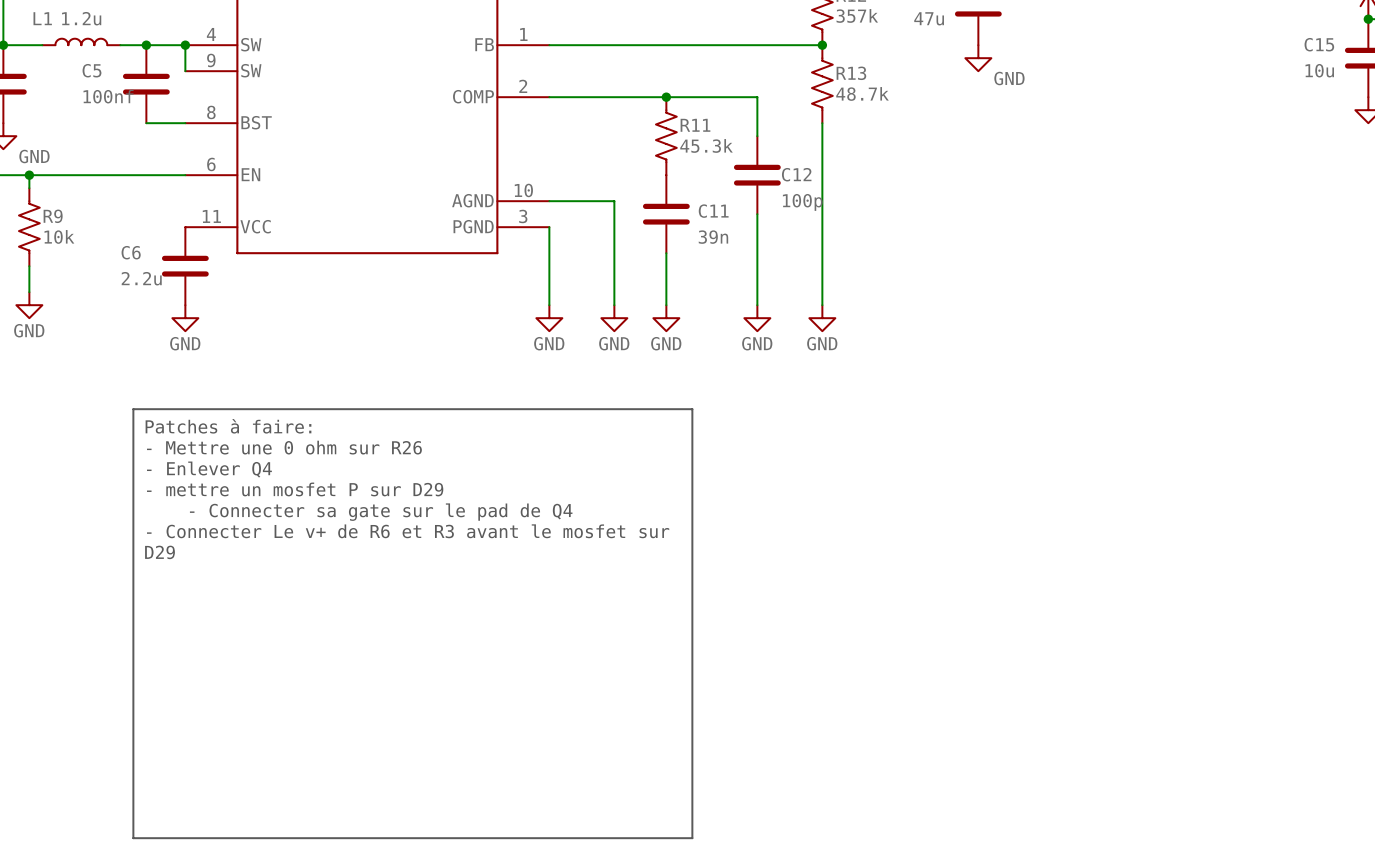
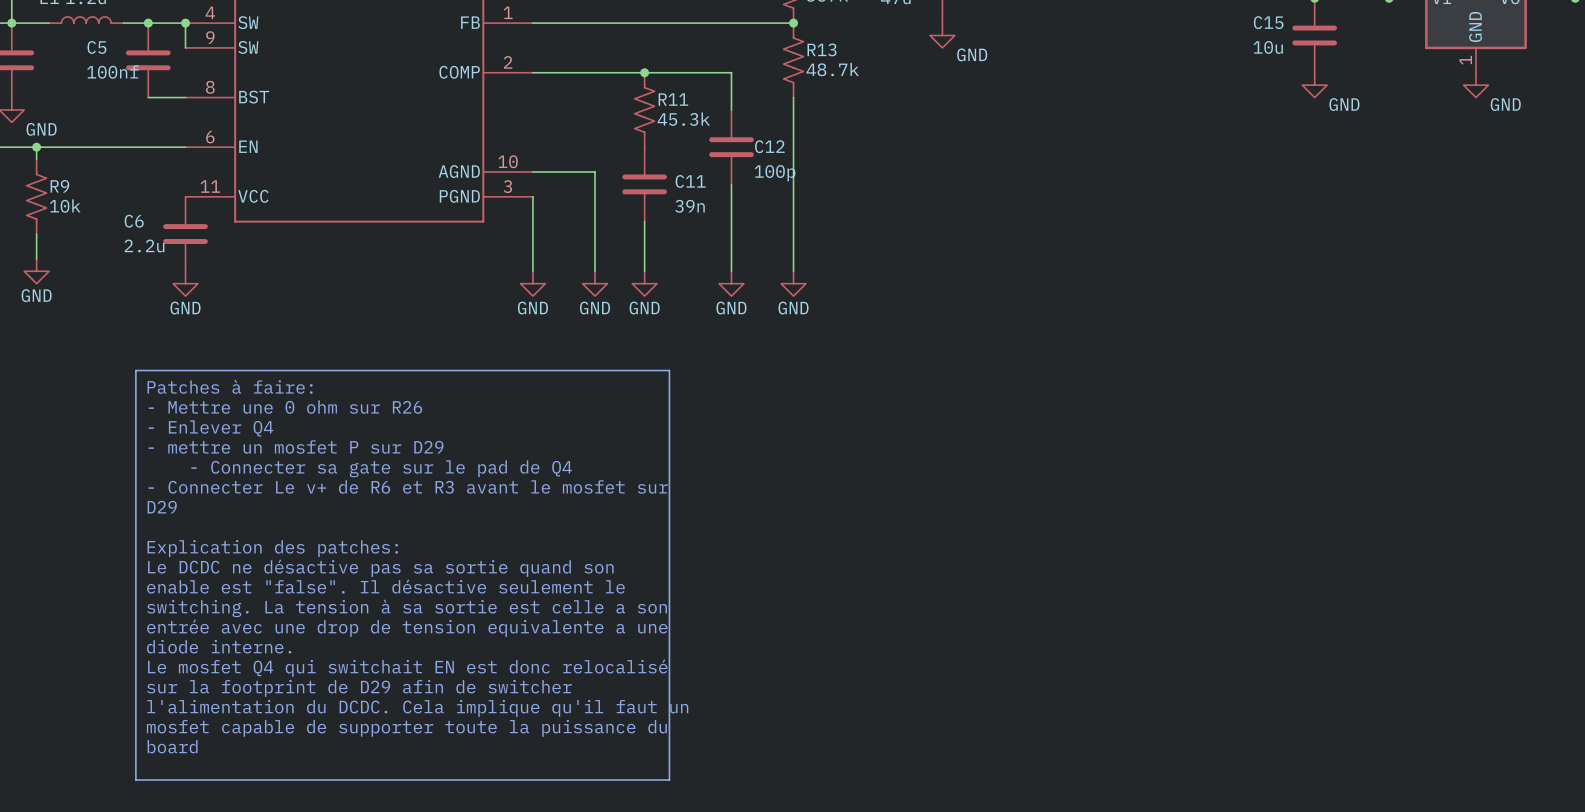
text: none -> Explication des patches: (272, 548)
text: none -> Le DCDC ne désactive pas sa sortie quand son (380, 568)
text: none -> enable est "false". Il désactive seulement le (385, 586)
text: none -> switching. La tension à sa sortie est celle a son (407, 608)
text: none -> entrée avec une drop de tension equivalente a une (407, 628)
text: none -> diode interne. (219, 646)
text: none -> Le mosfet Q4 qui switchait EN est donc relocalisé (407, 668)
text: none -> sur la footprint de D29 afin de switcher (359, 688)
text: none -> l'alimentation du DCDC. Cela implique qu'il faut un (417, 708)
text: none -> mosfet capable de supporter toute la puissance du (406, 728)
text: none -> board (172, 746)

